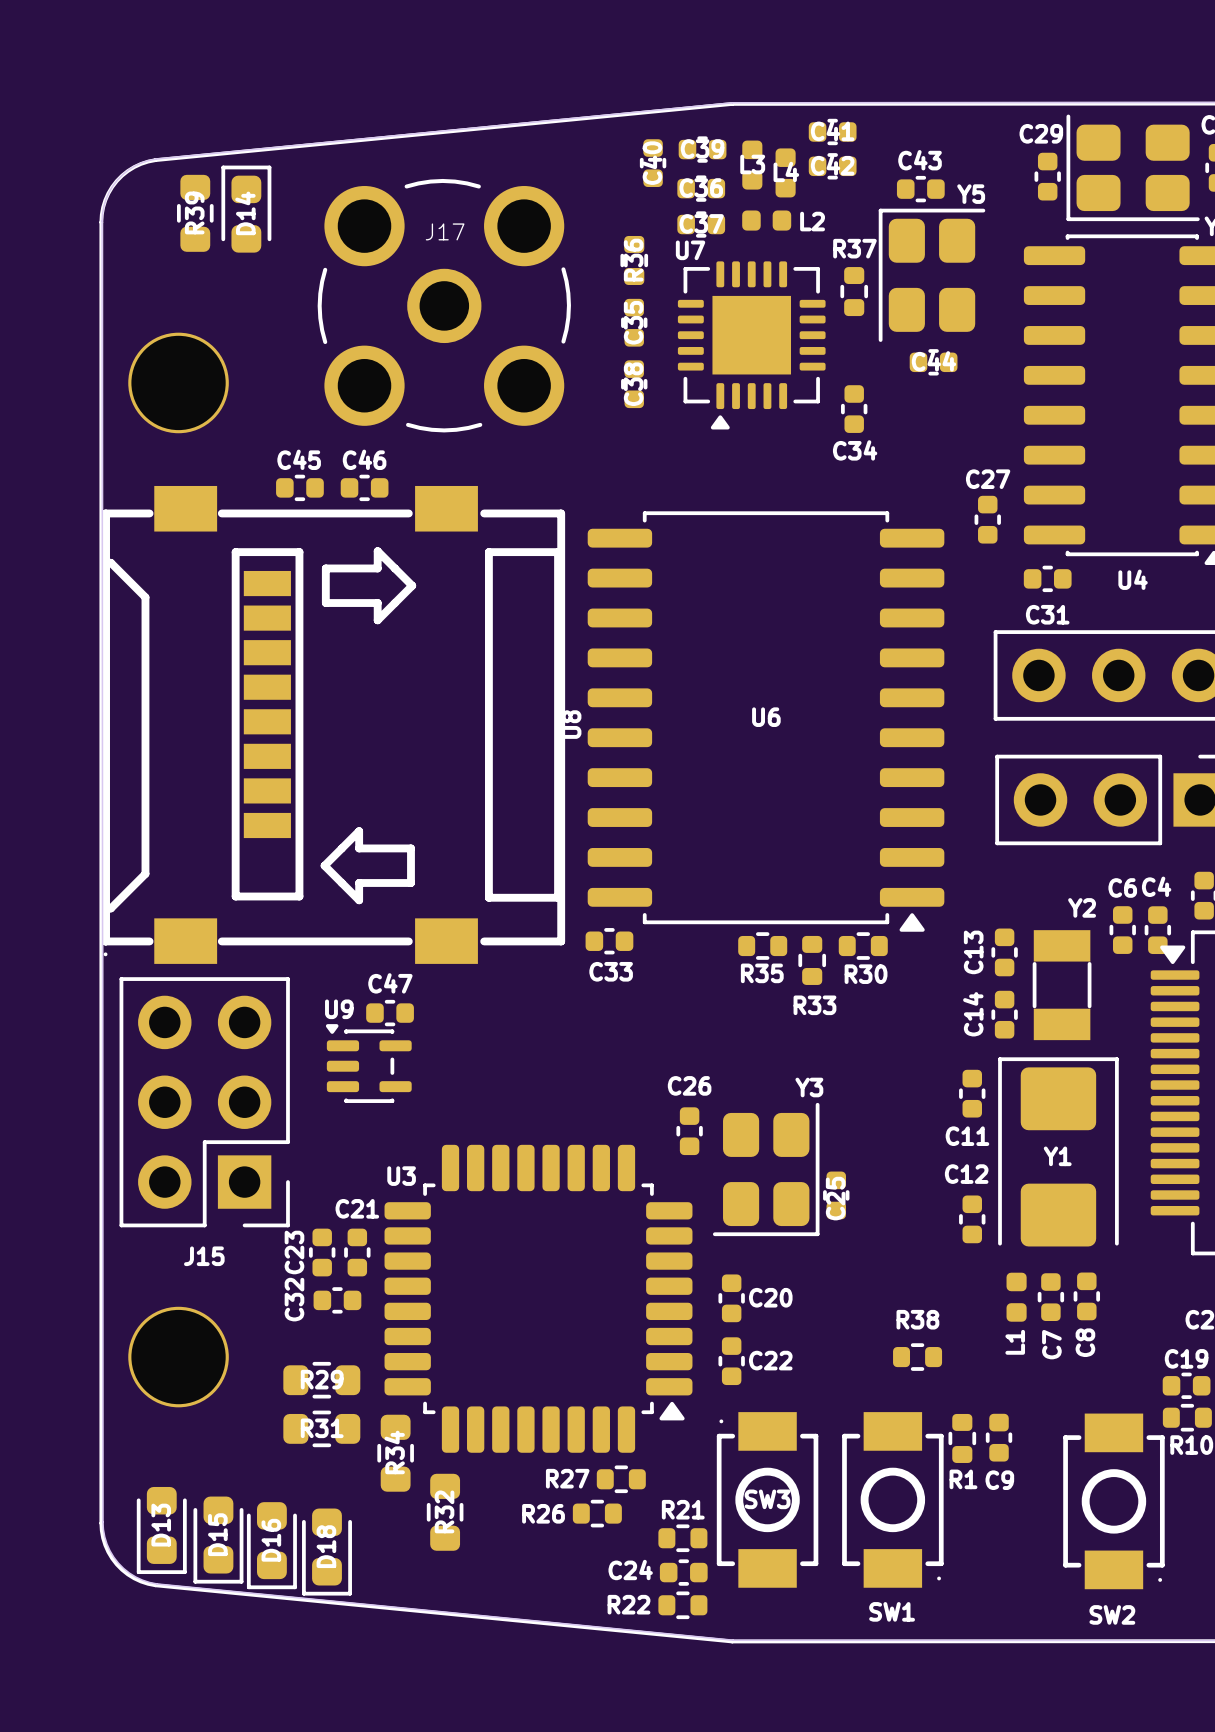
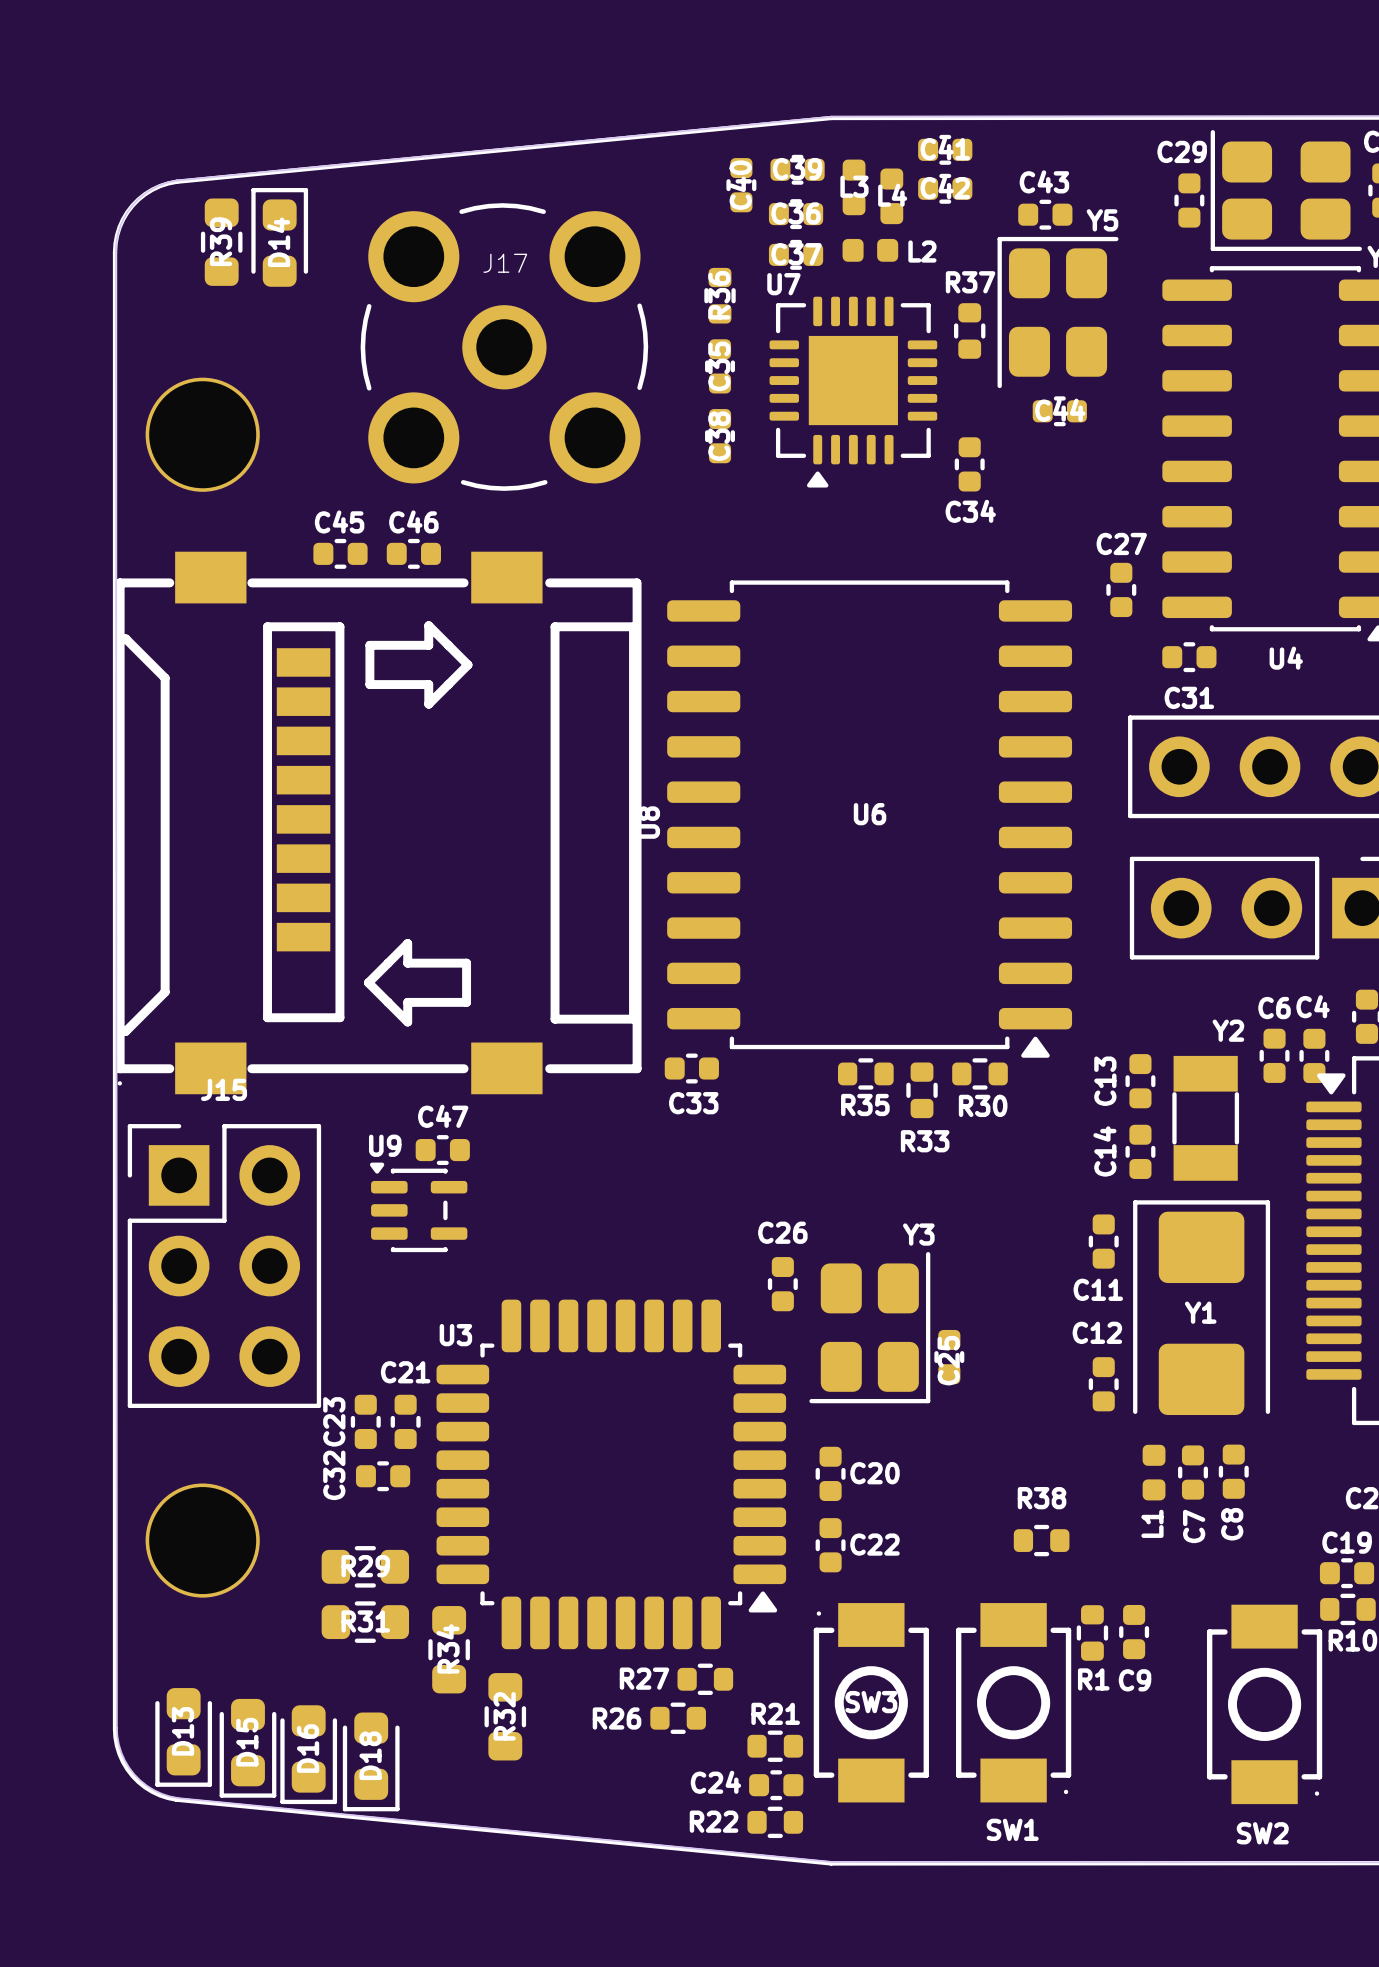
J15 rotation: 0° (204, 1102) -> 180° (224, 1266)

